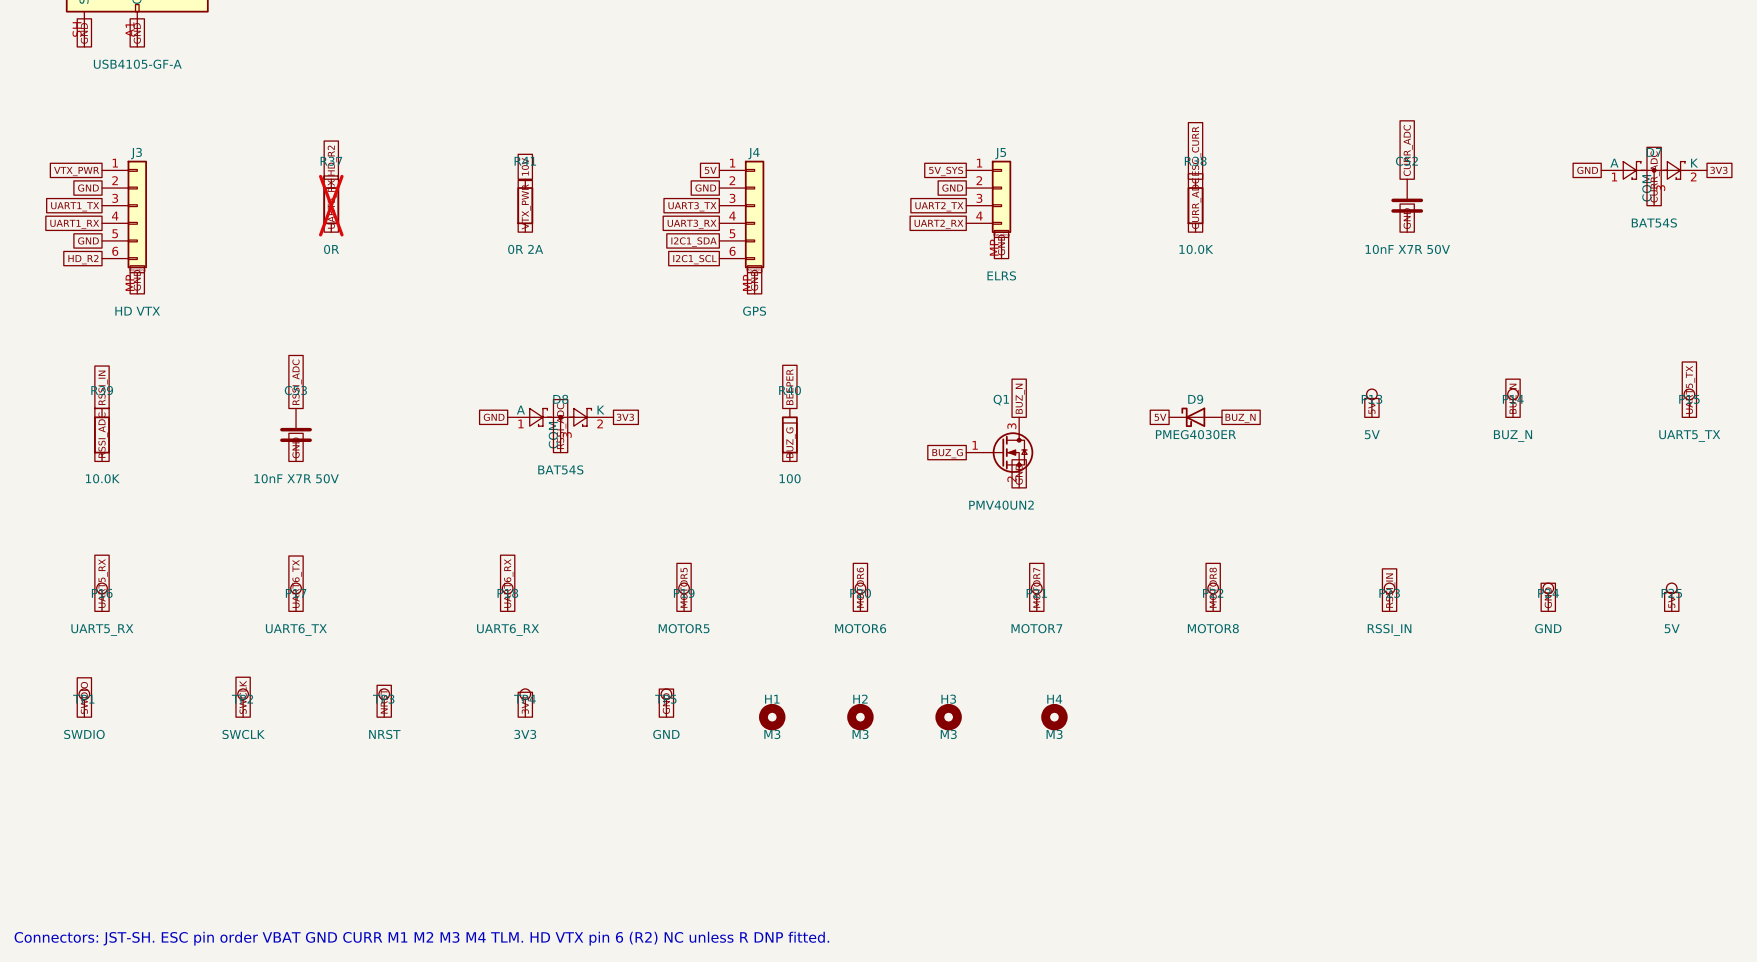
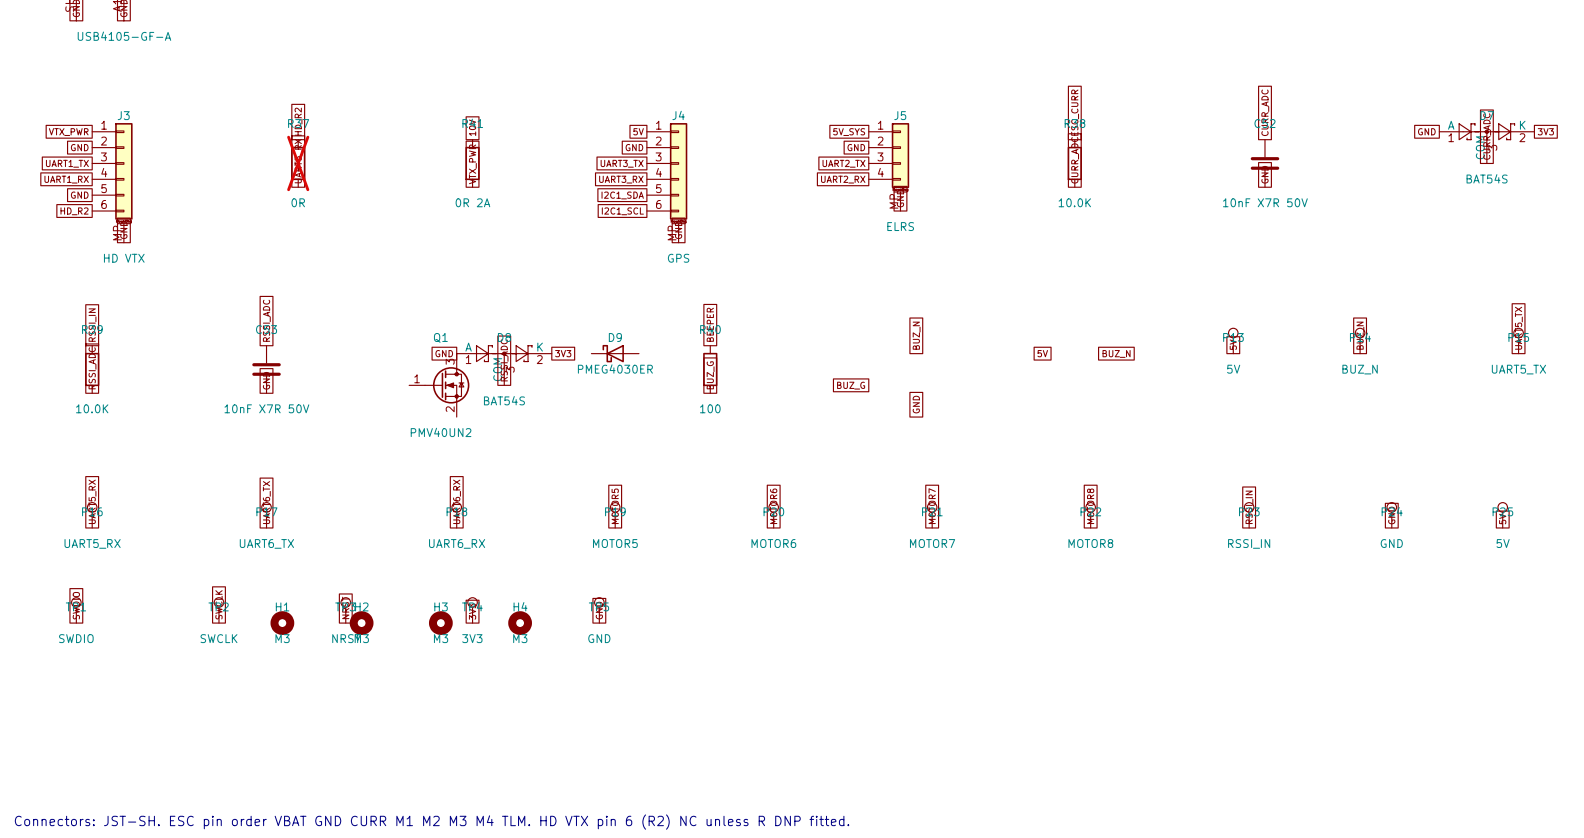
D9 position: (1195, 417) -> (615, 353)
Q1 position: (999, 452) -> (439, 385)
H1 position: (772, 717) -> (282, 623)
H2 position: (860, 717) -> (361, 623)
H3 position: (948, 717) -> (440, 623)
H4 position: (1054, 717) -> (520, 623)

